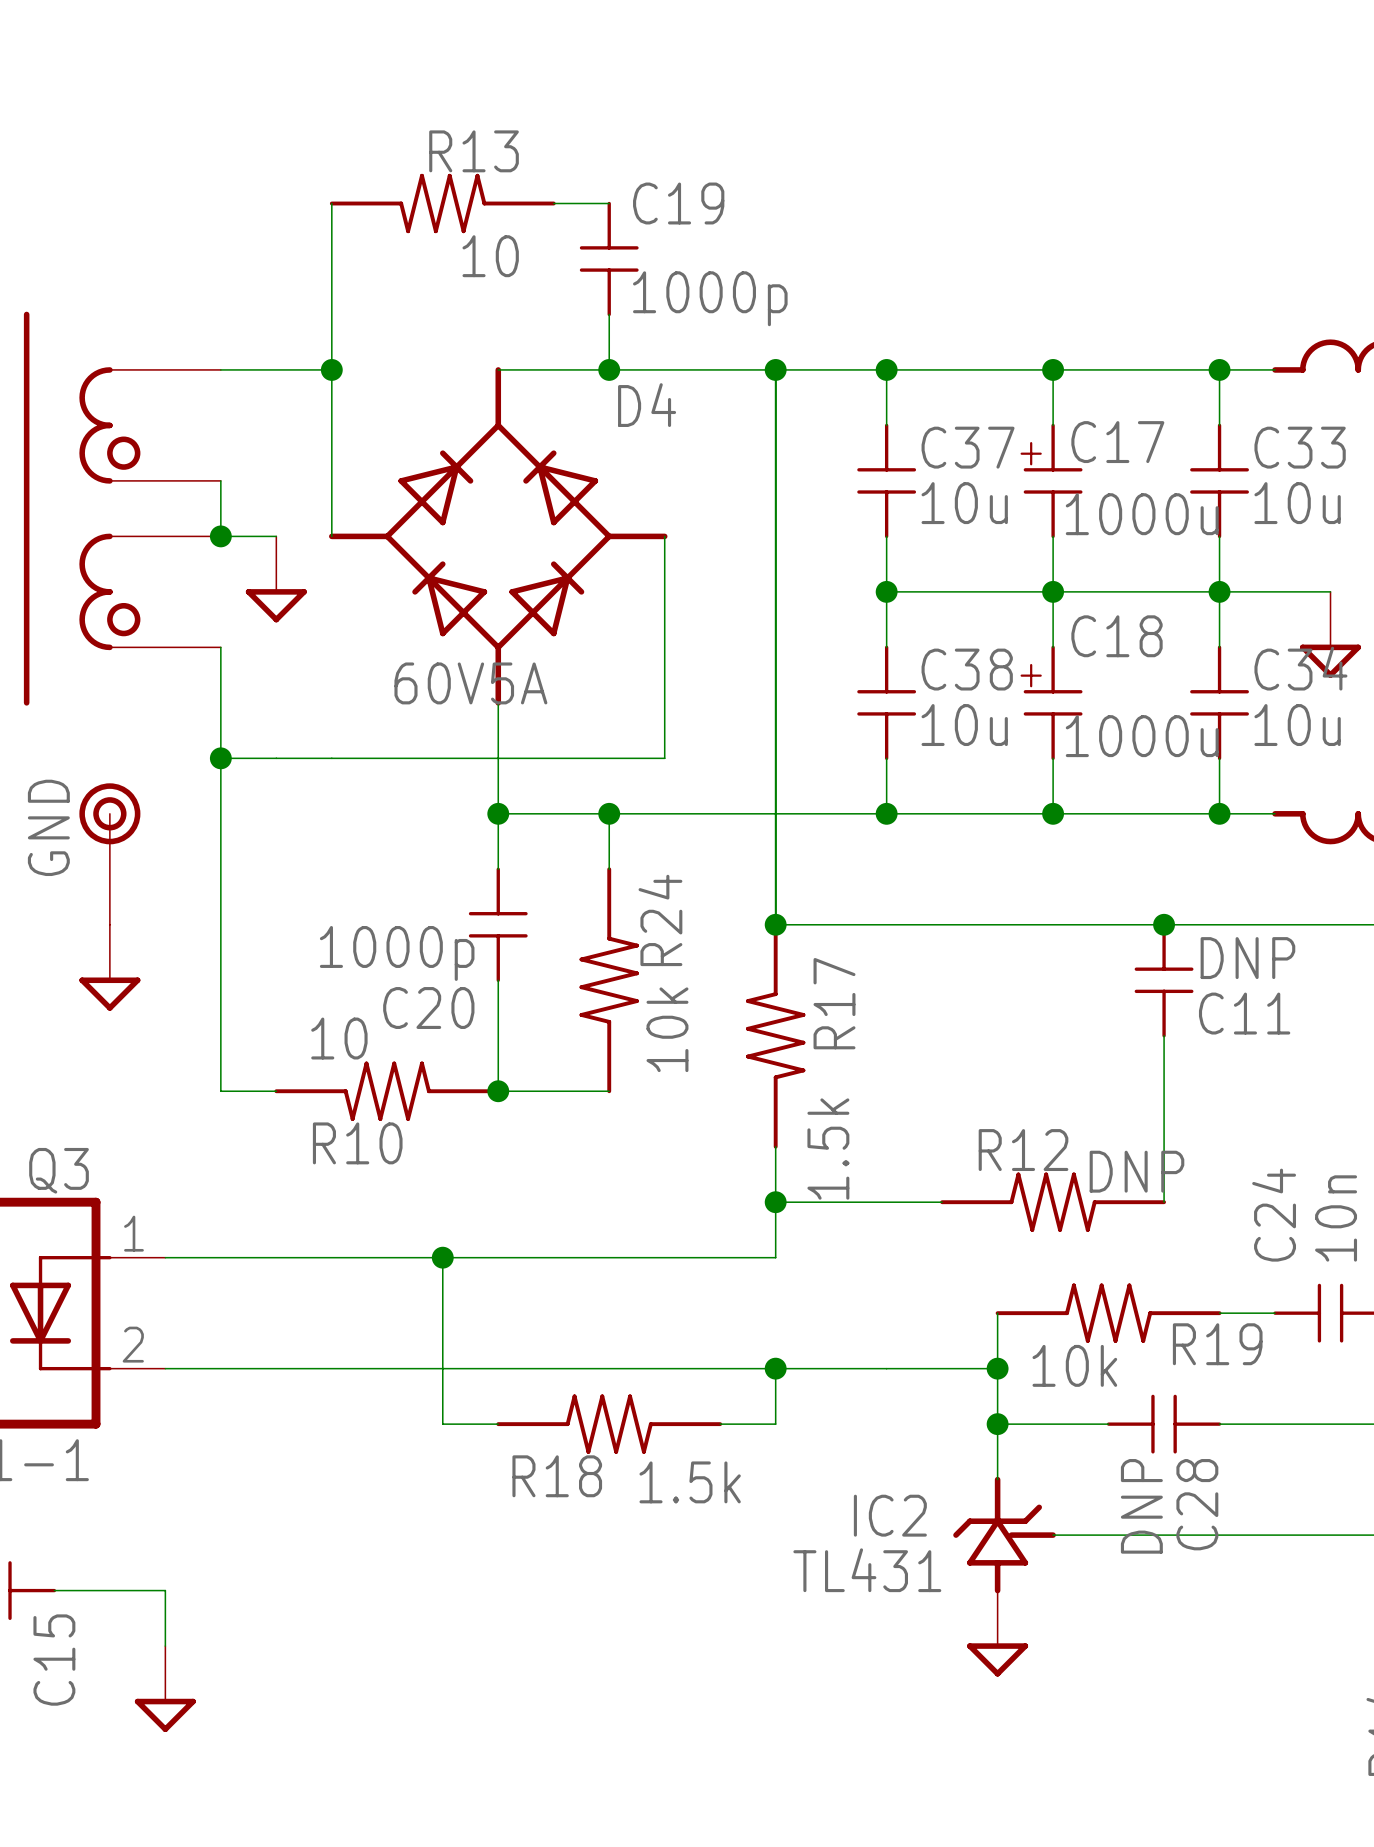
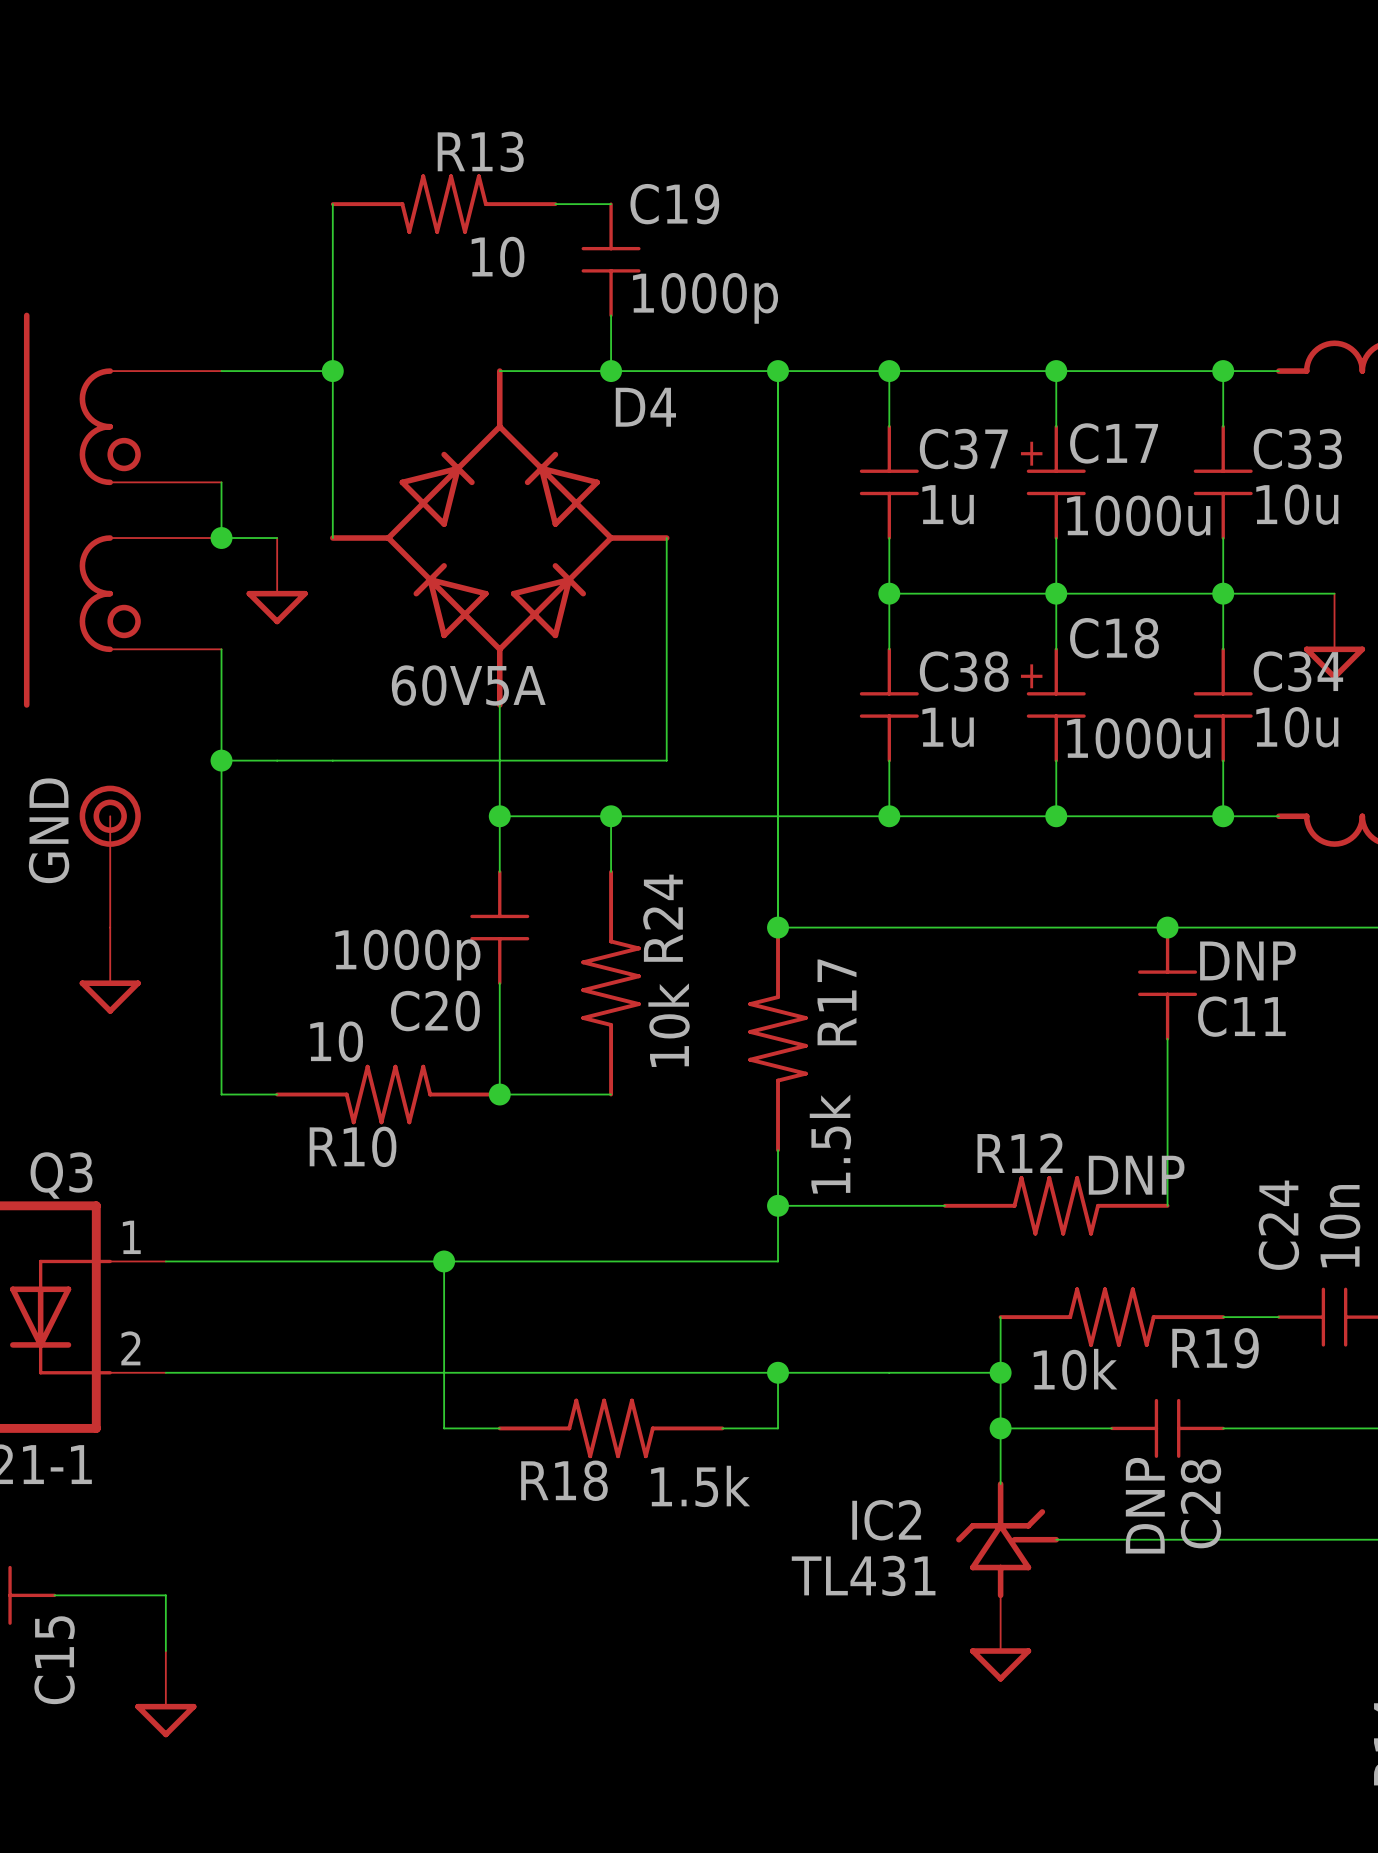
C37 value: 10u (964, 503) -> 1u (948, 505)
C38 value: 10u (964, 725) -> 1u (948, 727)

